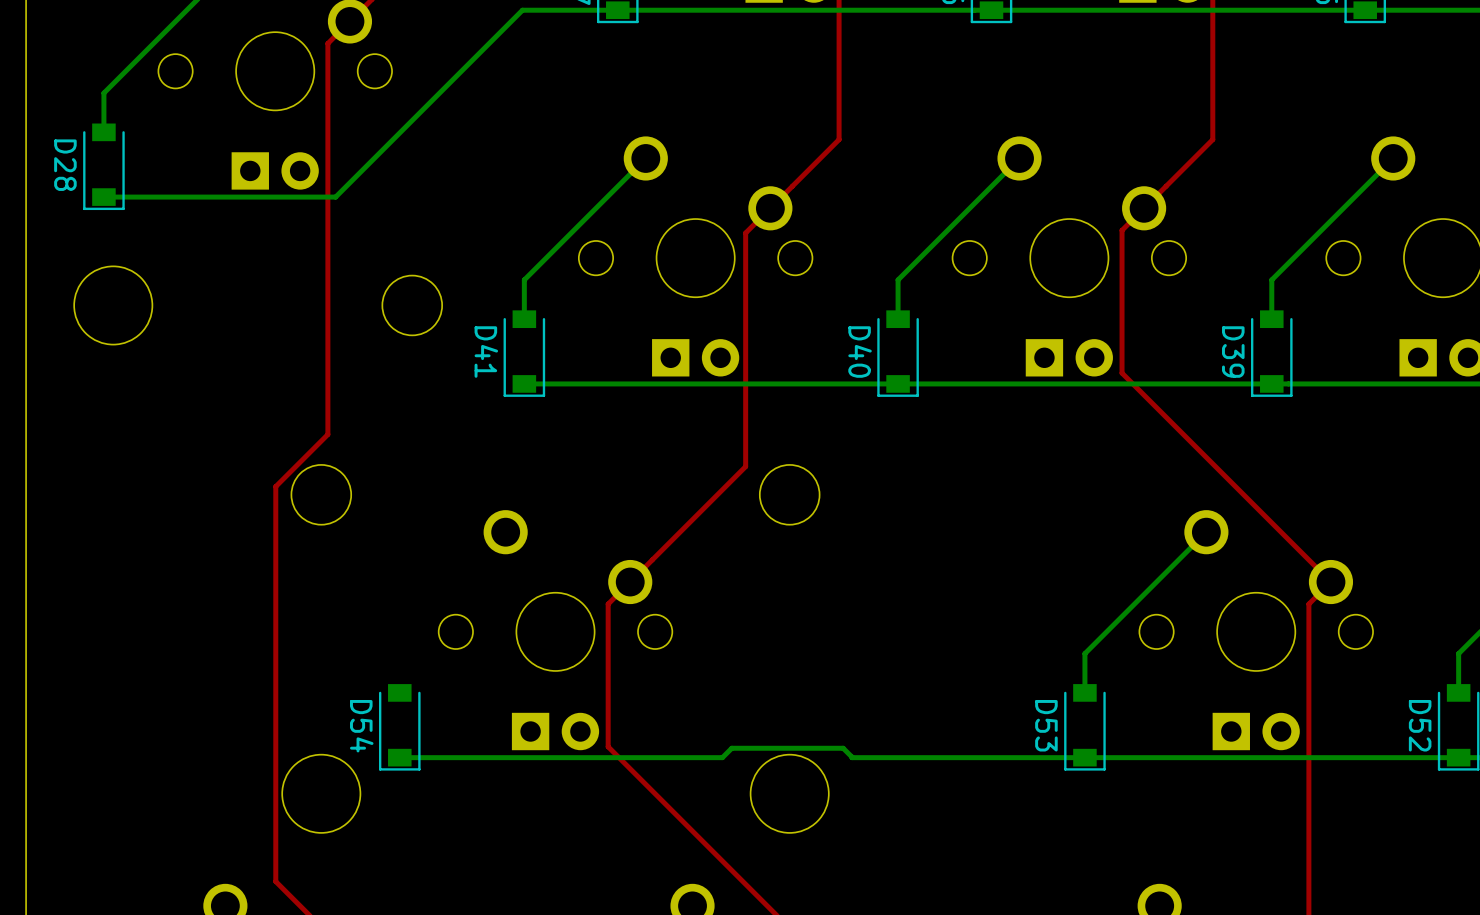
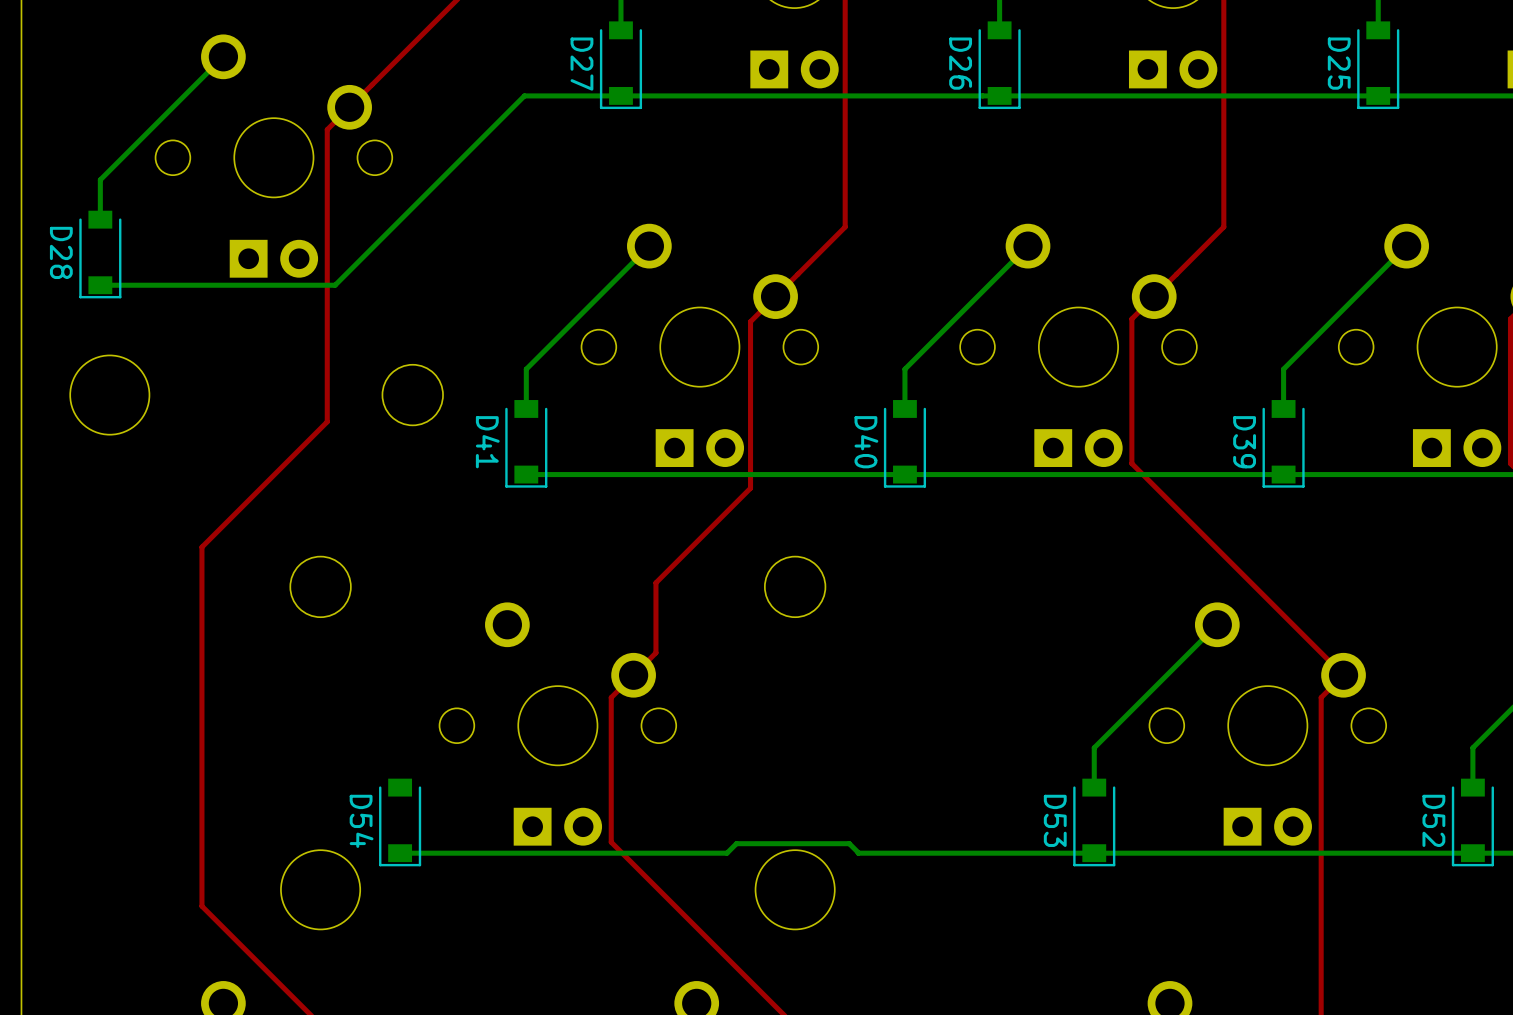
top track: (327, 331) (327, 434) (275, 486) (275, 881) -> (327, 421) (201, 547) (201, 906) (274, 978)
top track: (745, 397) (745, 466) (652, 559) -> (750, 488) (655, 582) (655, 652)

